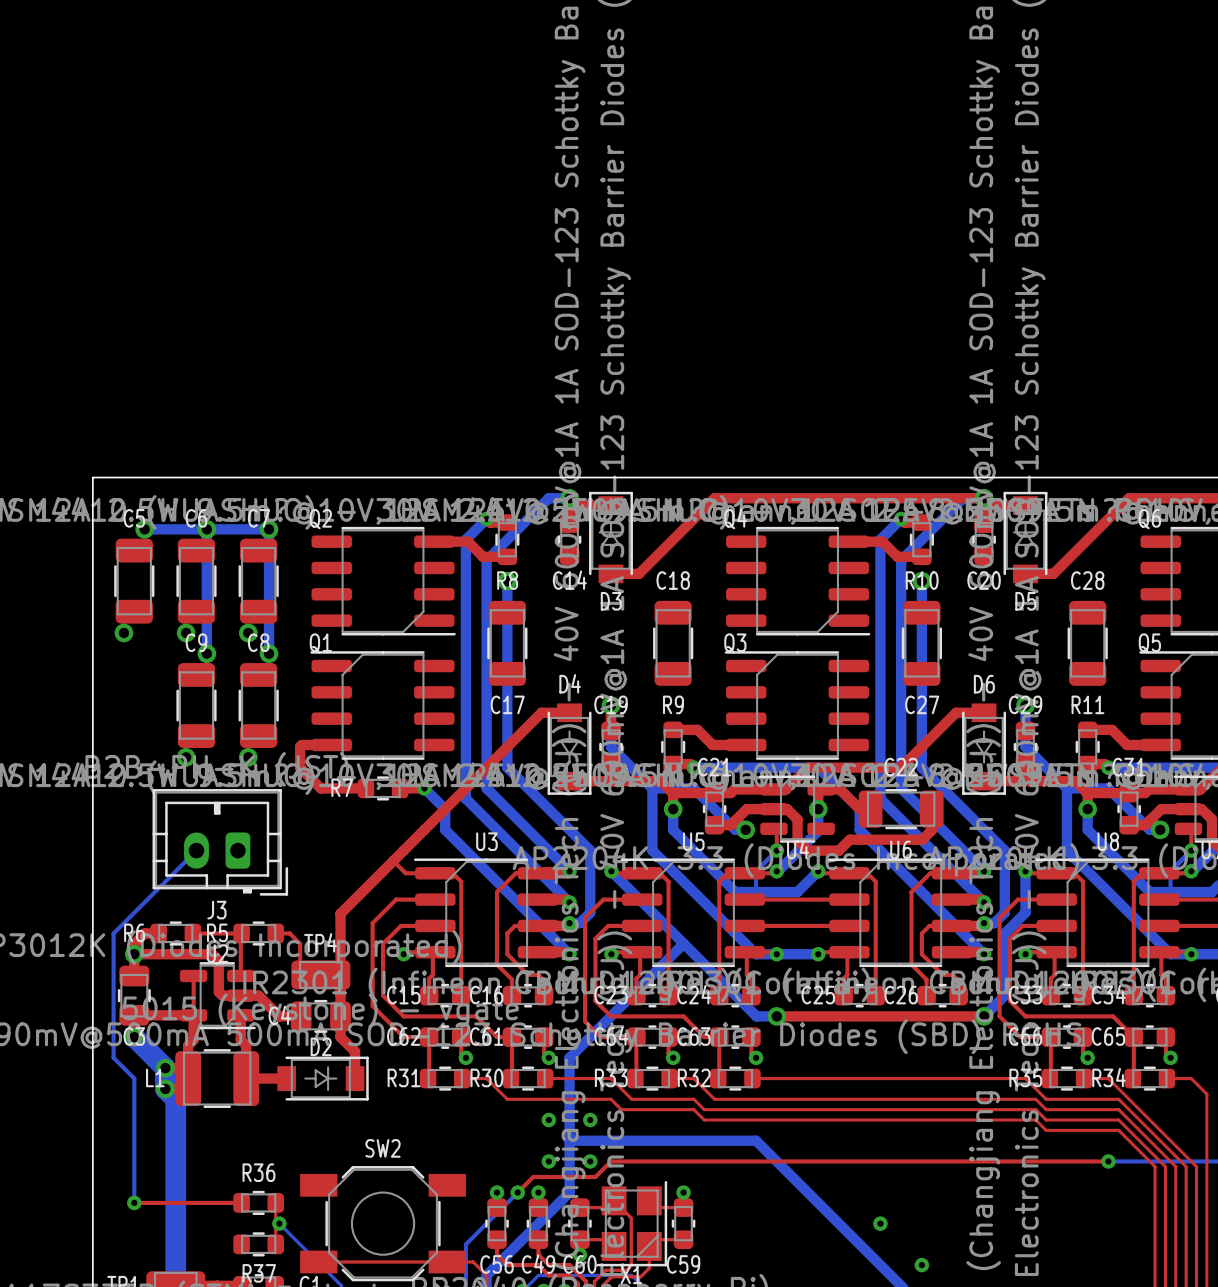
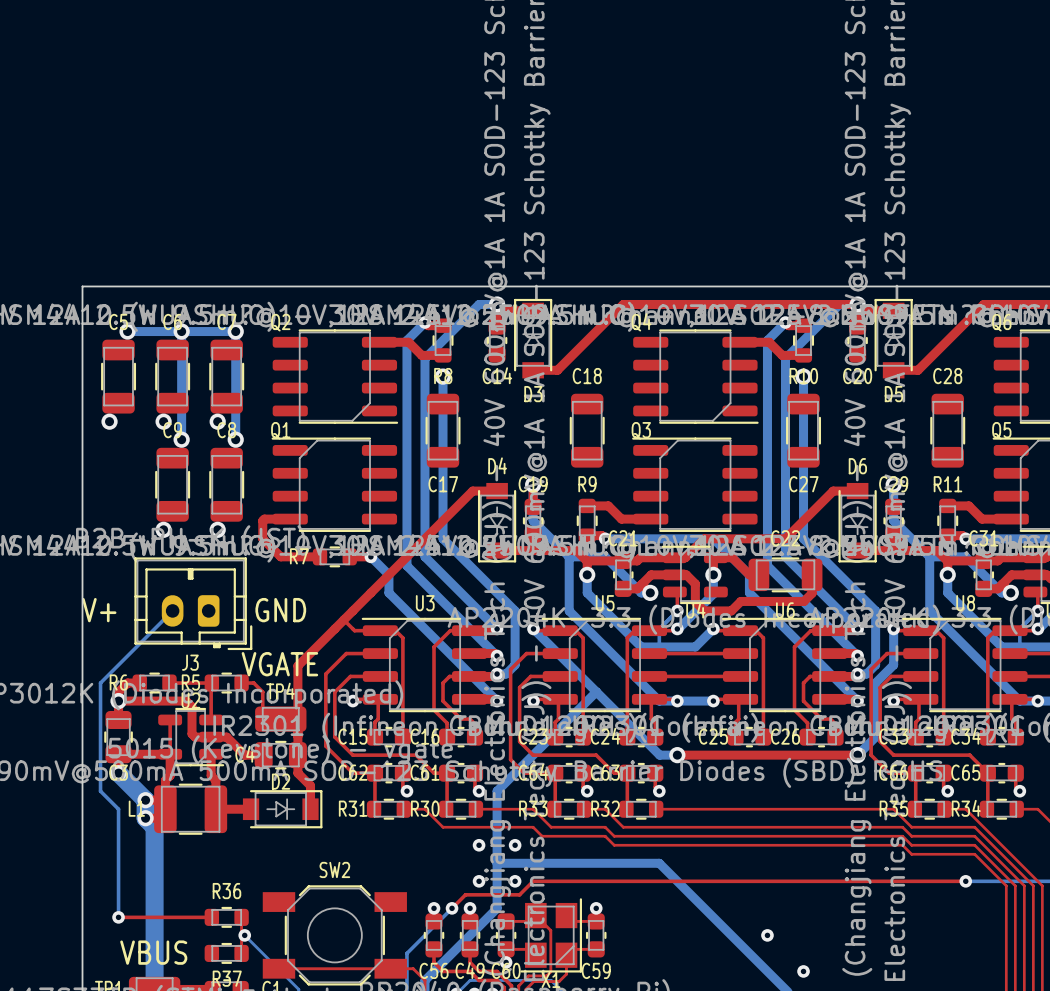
text: none -> V+ (99, 610)
text: none -> GND (280, 610)
text: none -> VGATE (279, 664)
text: none -> VBUS (153, 952)

